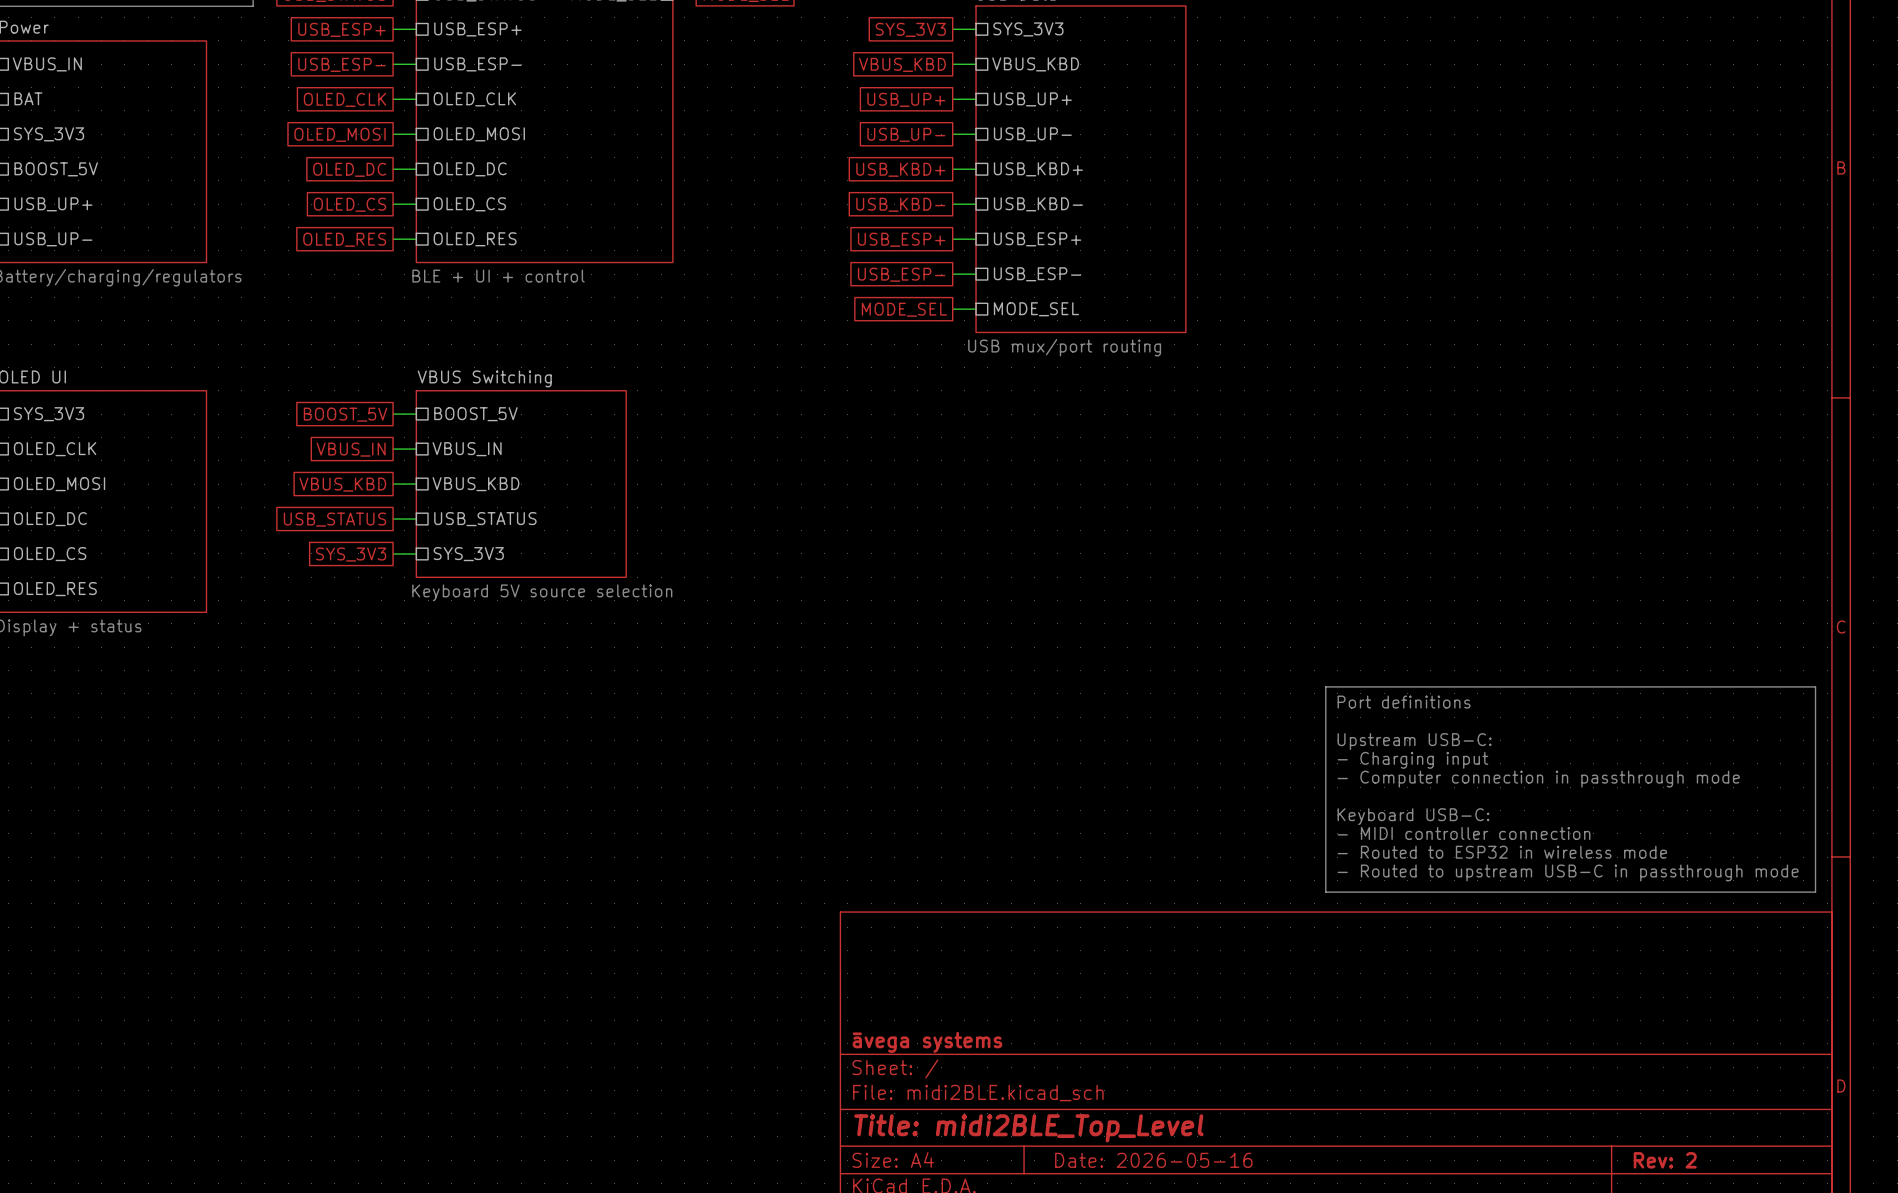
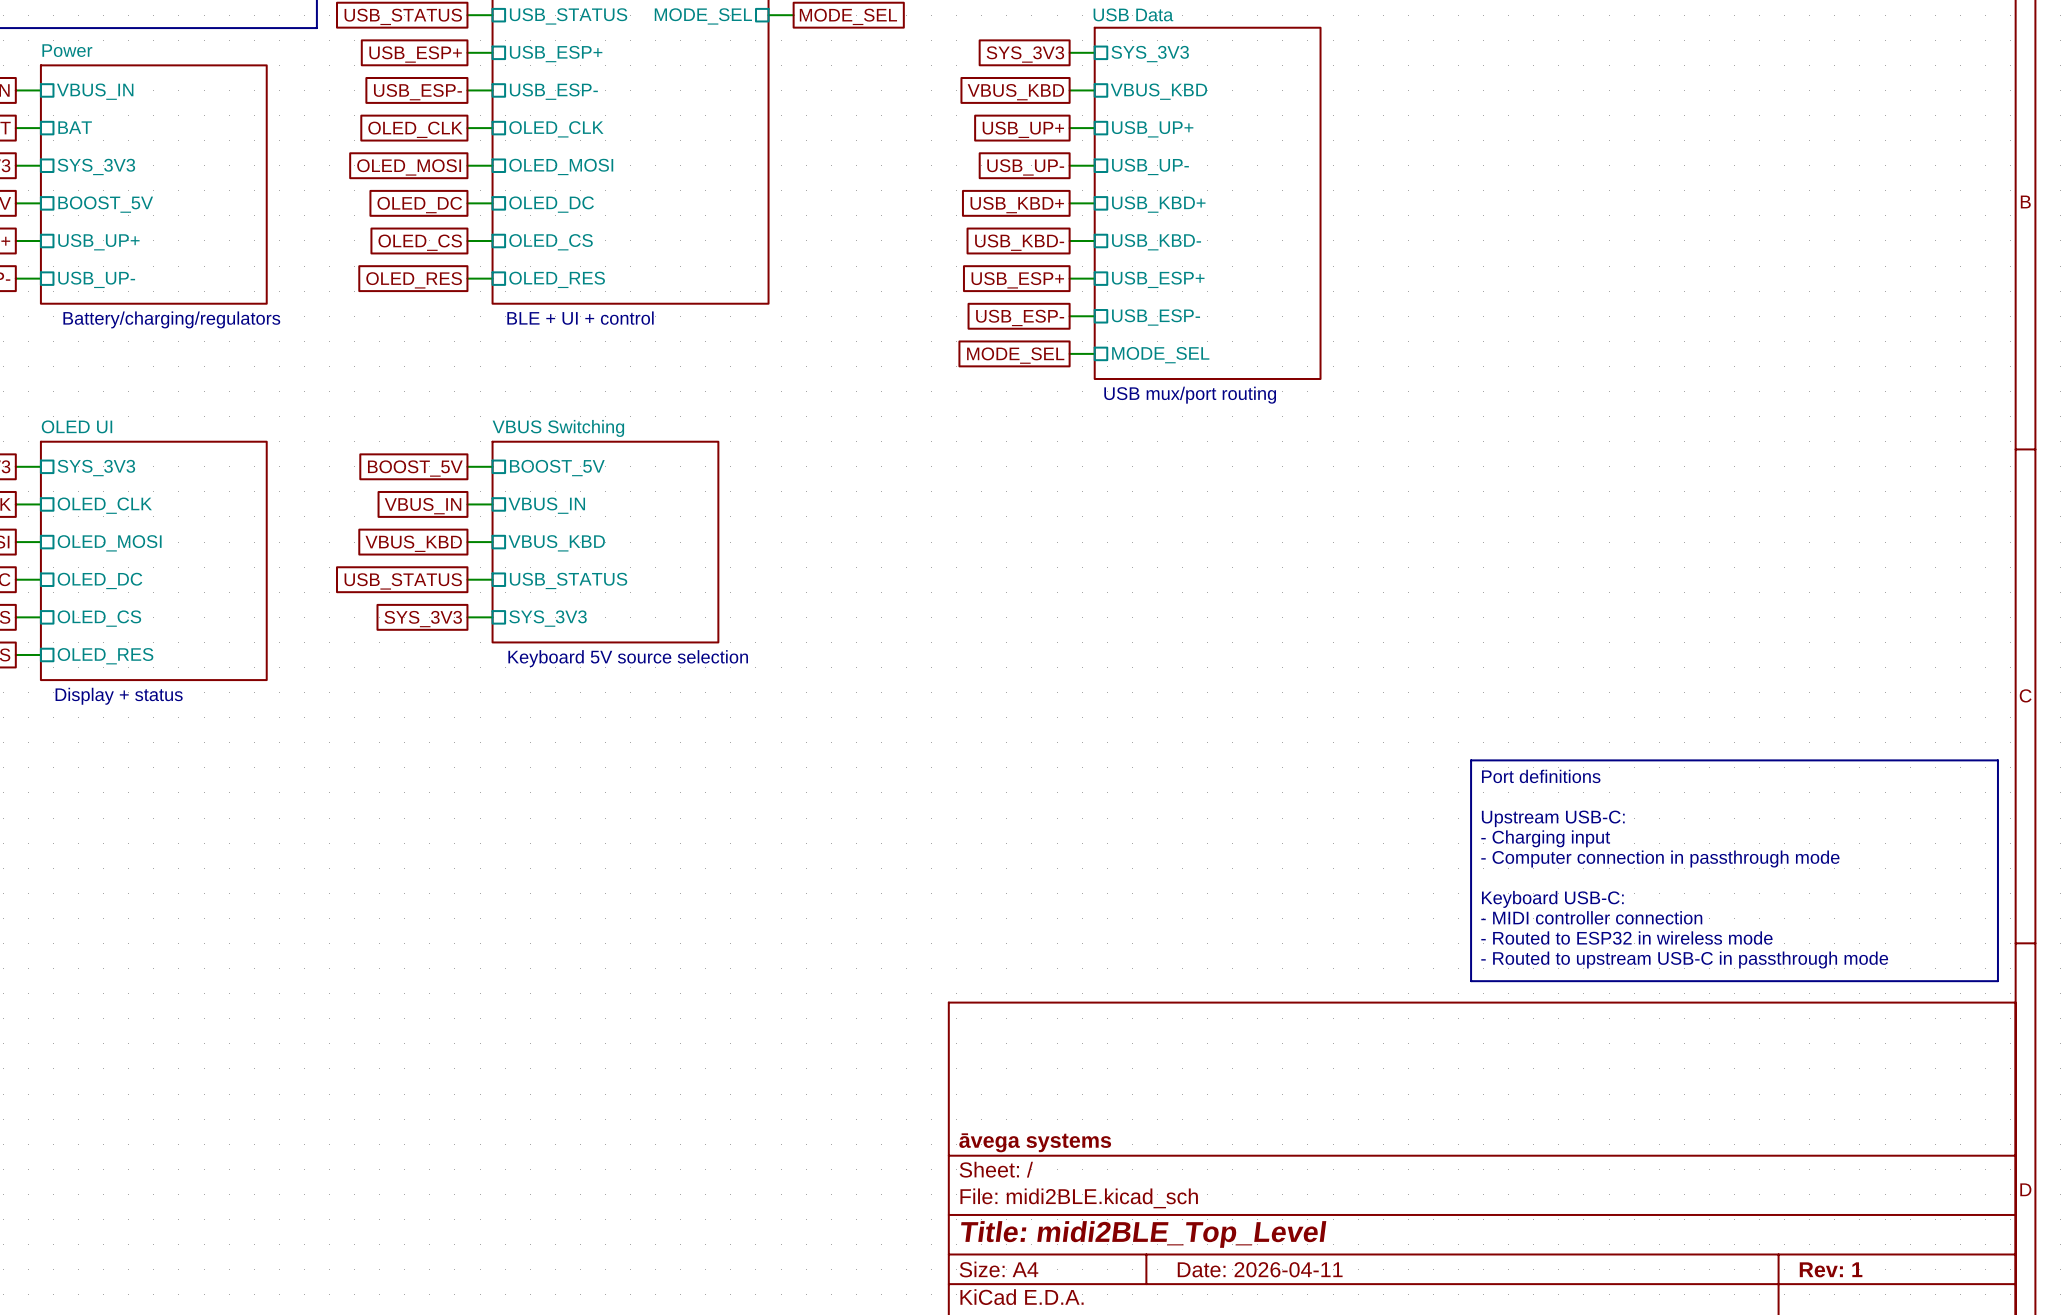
title block: Date: 2026-05-16 (1153, 1160) -> Date: 2026-04-11 (1260, 1269)
title block: Rev: 2 (1665, 1160) -> Rev: 1 (1831, 1269)

